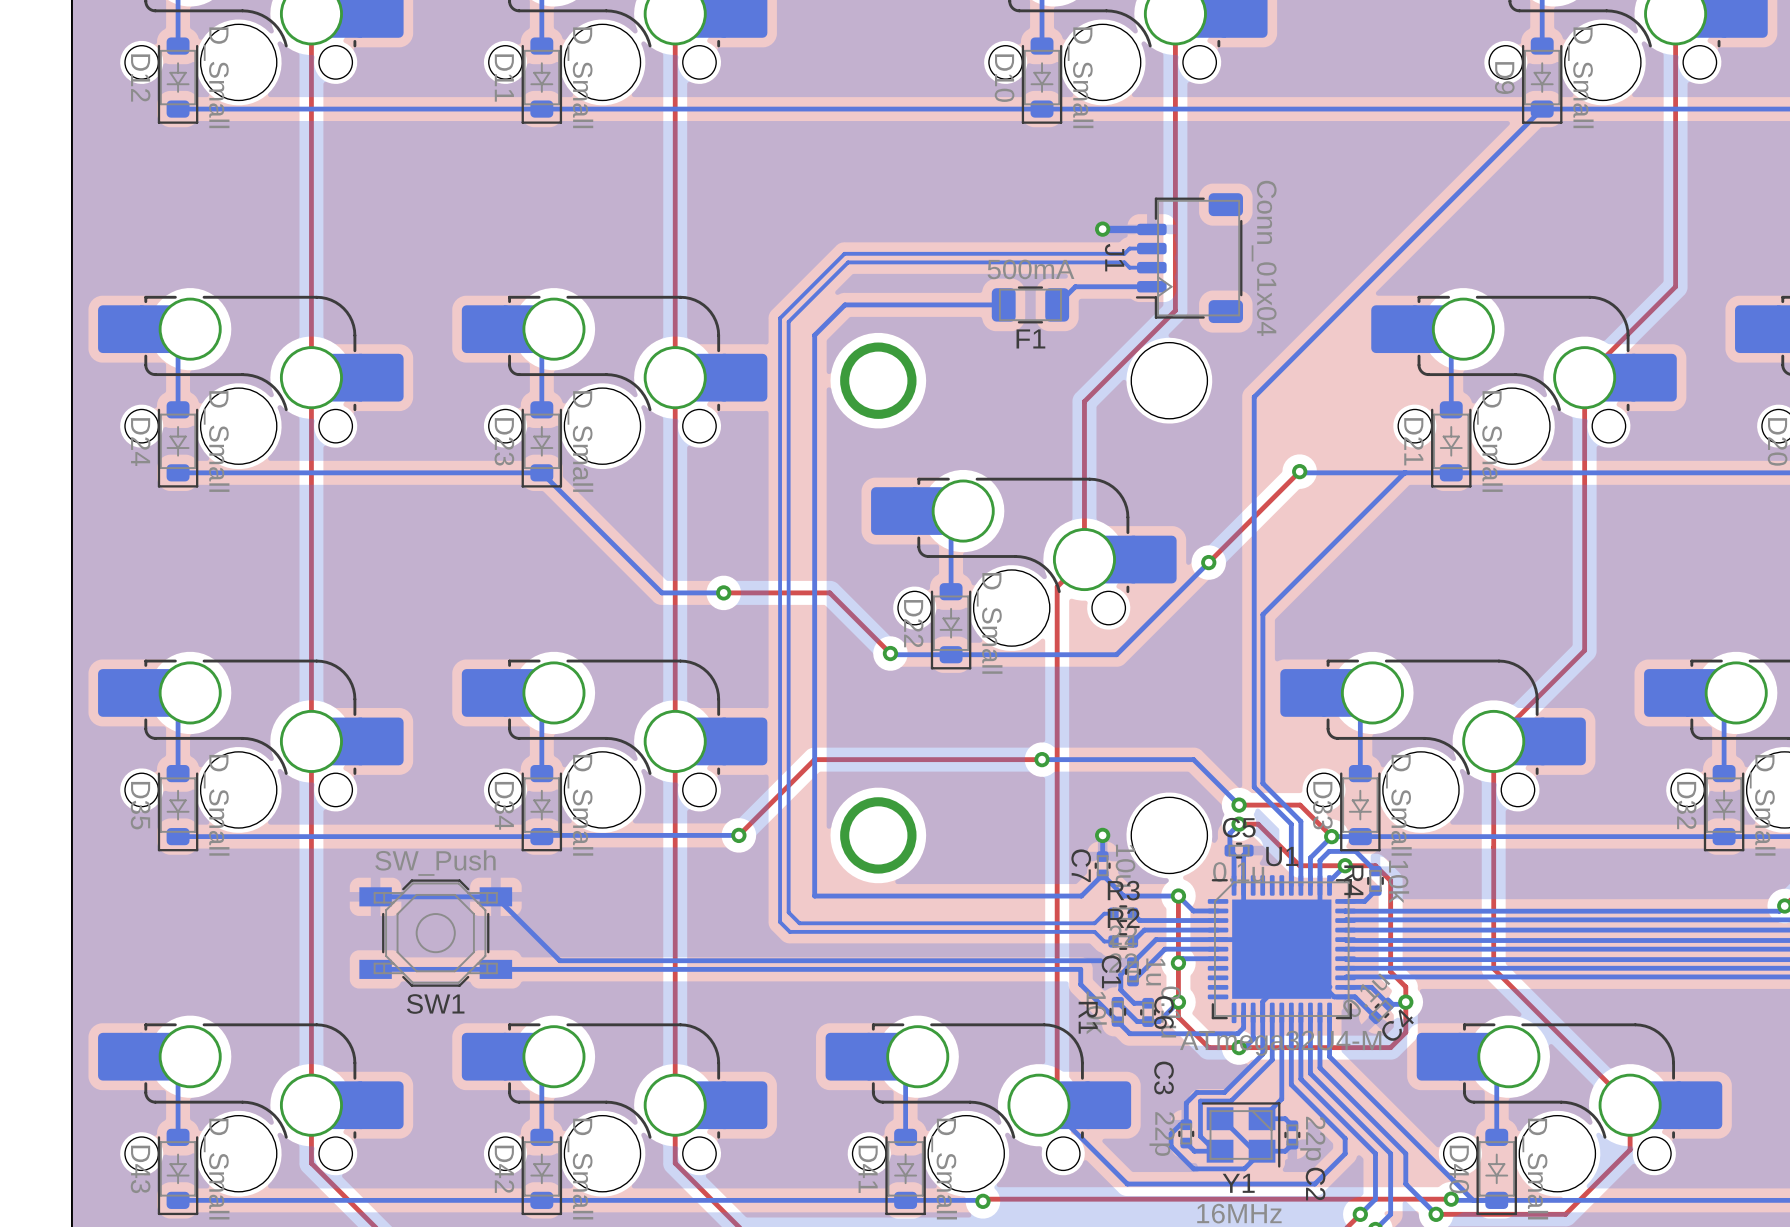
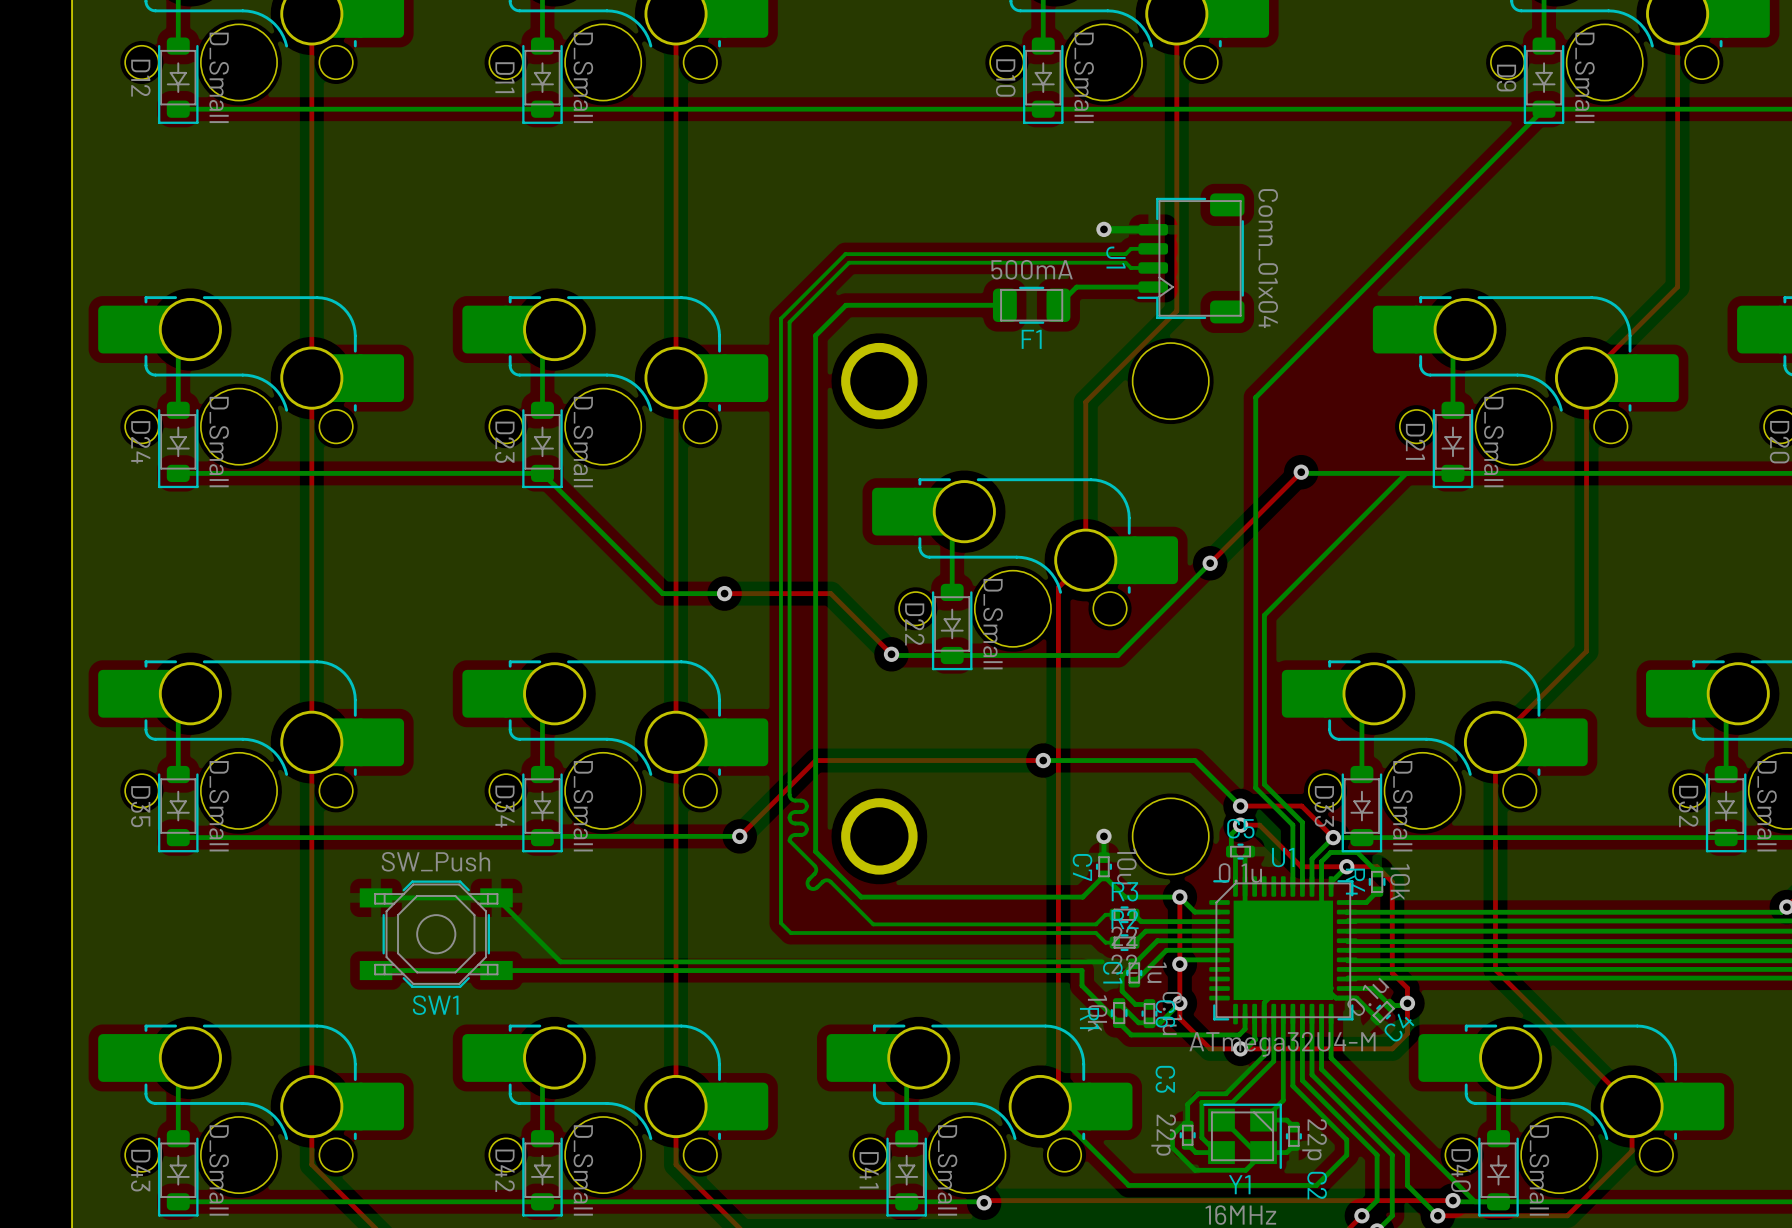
bottom track: (788, 793) (788, 912) (799, 923) (872, 923) -> (789, 794) (792, 799) (803, 800) (806, 804) (804, 810) (793, 812) (789, 817) (793, 823) (804, 824) (806, 831) (802, 834) (792, 835) (789, 840) (815, 867) (815, 872) (807, 881) (808, 886) (814, 888) (824, 880) (829, 881) (873, 924)
bottom track: (814, 850) (814, 896) (860, 896) -> (815, 851) (861, 897)

